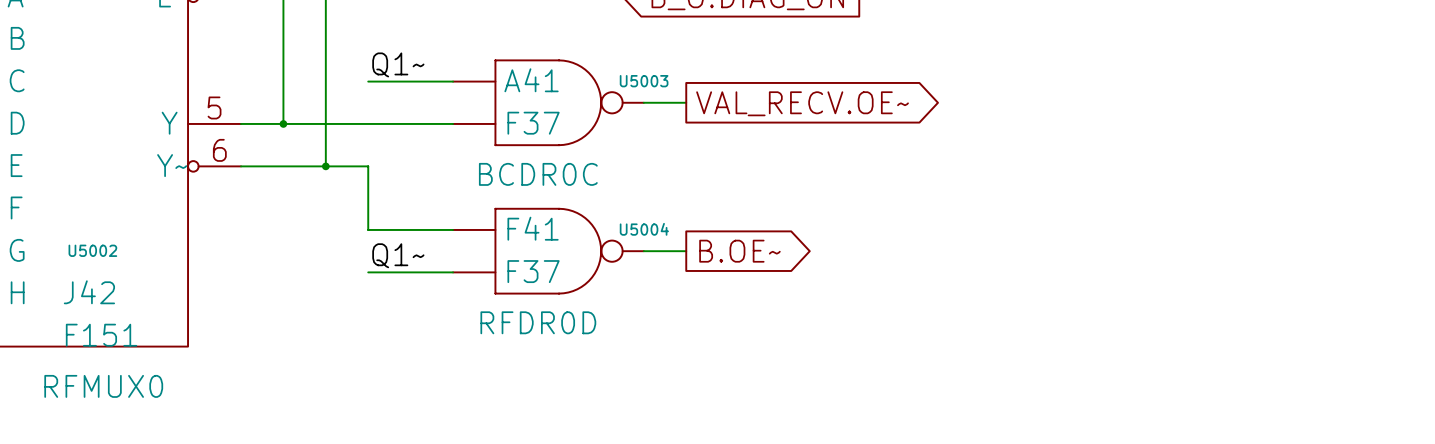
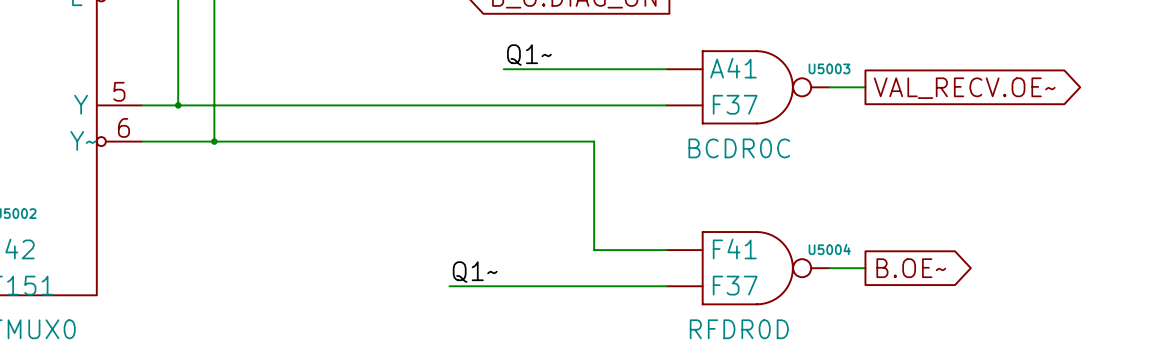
label: Q1~ (398, 64) -> none
label: none -> Q1~ (529, 55)
wire: (368, 81) (453, 81) -> none
wire: none -> (503, 69) (666, 69)
U5003 position: (548, 102) -> (747, 87)
wire: (643, 102) (686, 102) -> none
wire: none -> (829, 87) (865, 87)
global label: VAL_RECV.OE~ (802, 103) -> none
global label: none -> VAL_RECV.OE~ (964, 88)
wire: none -> (322, 105) (666, 105)
wire: (368, 166) (368, 229) (453, 229) -> (250, 141) (594, 141) (594, 250) (666, 250)
U5004 position: (548, 251) -> (747, 268)
wire: (643, 251) (686, 251) -> none
global label: B.OE~ (739, 251) -> none
label: Q1~ (398, 255) -> none
wire: (368, 272) (453, 272) -> none
wire: none -> (829, 268) (865, 268)
global label: none -> B.OE~ (911, 268)
label: none -> Q1~ (475, 272)
wire: none -> (449, 286) (666, 286)

